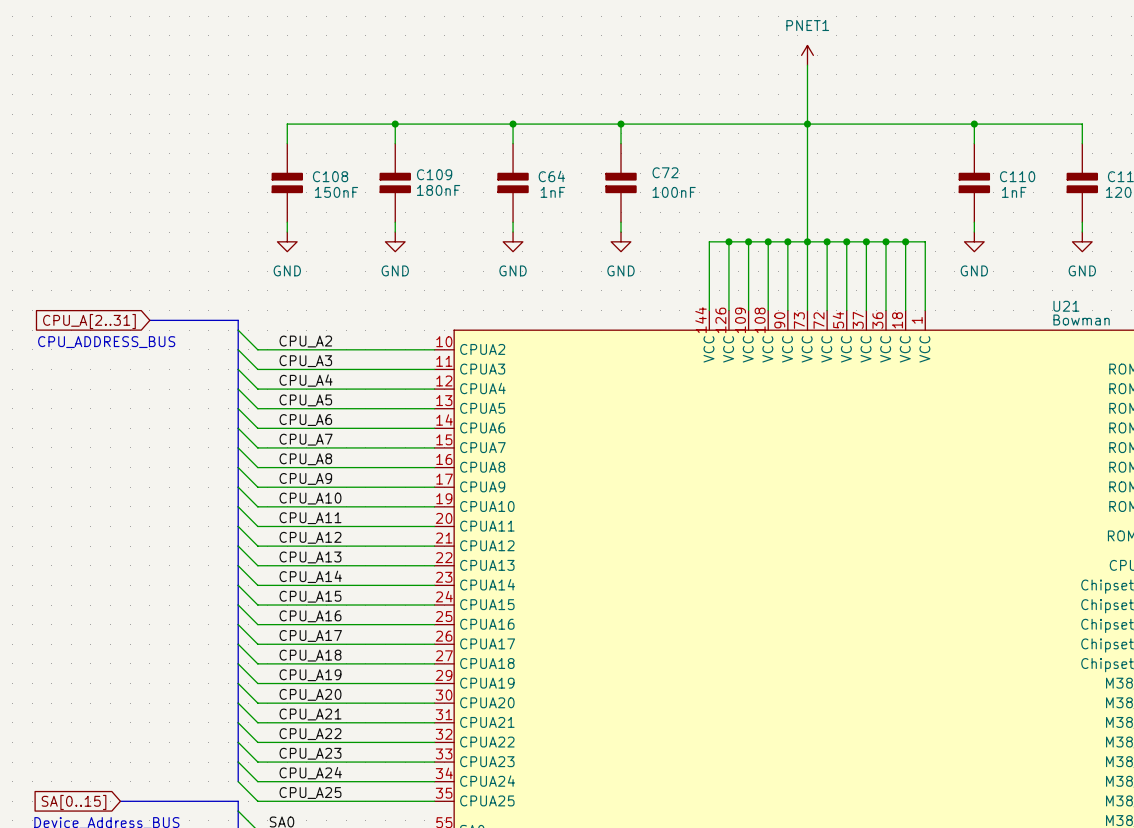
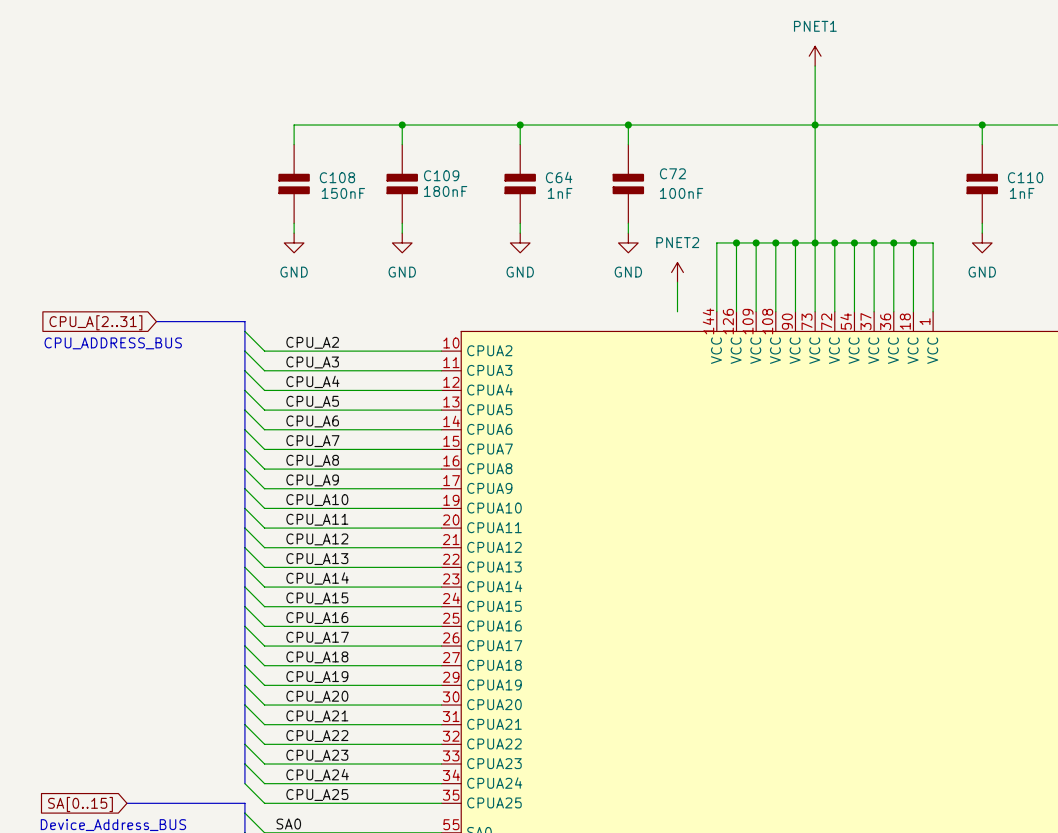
power symbol: none -> PNET2 (677, 272)
wire: none -> (677, 282) (677, 311)

